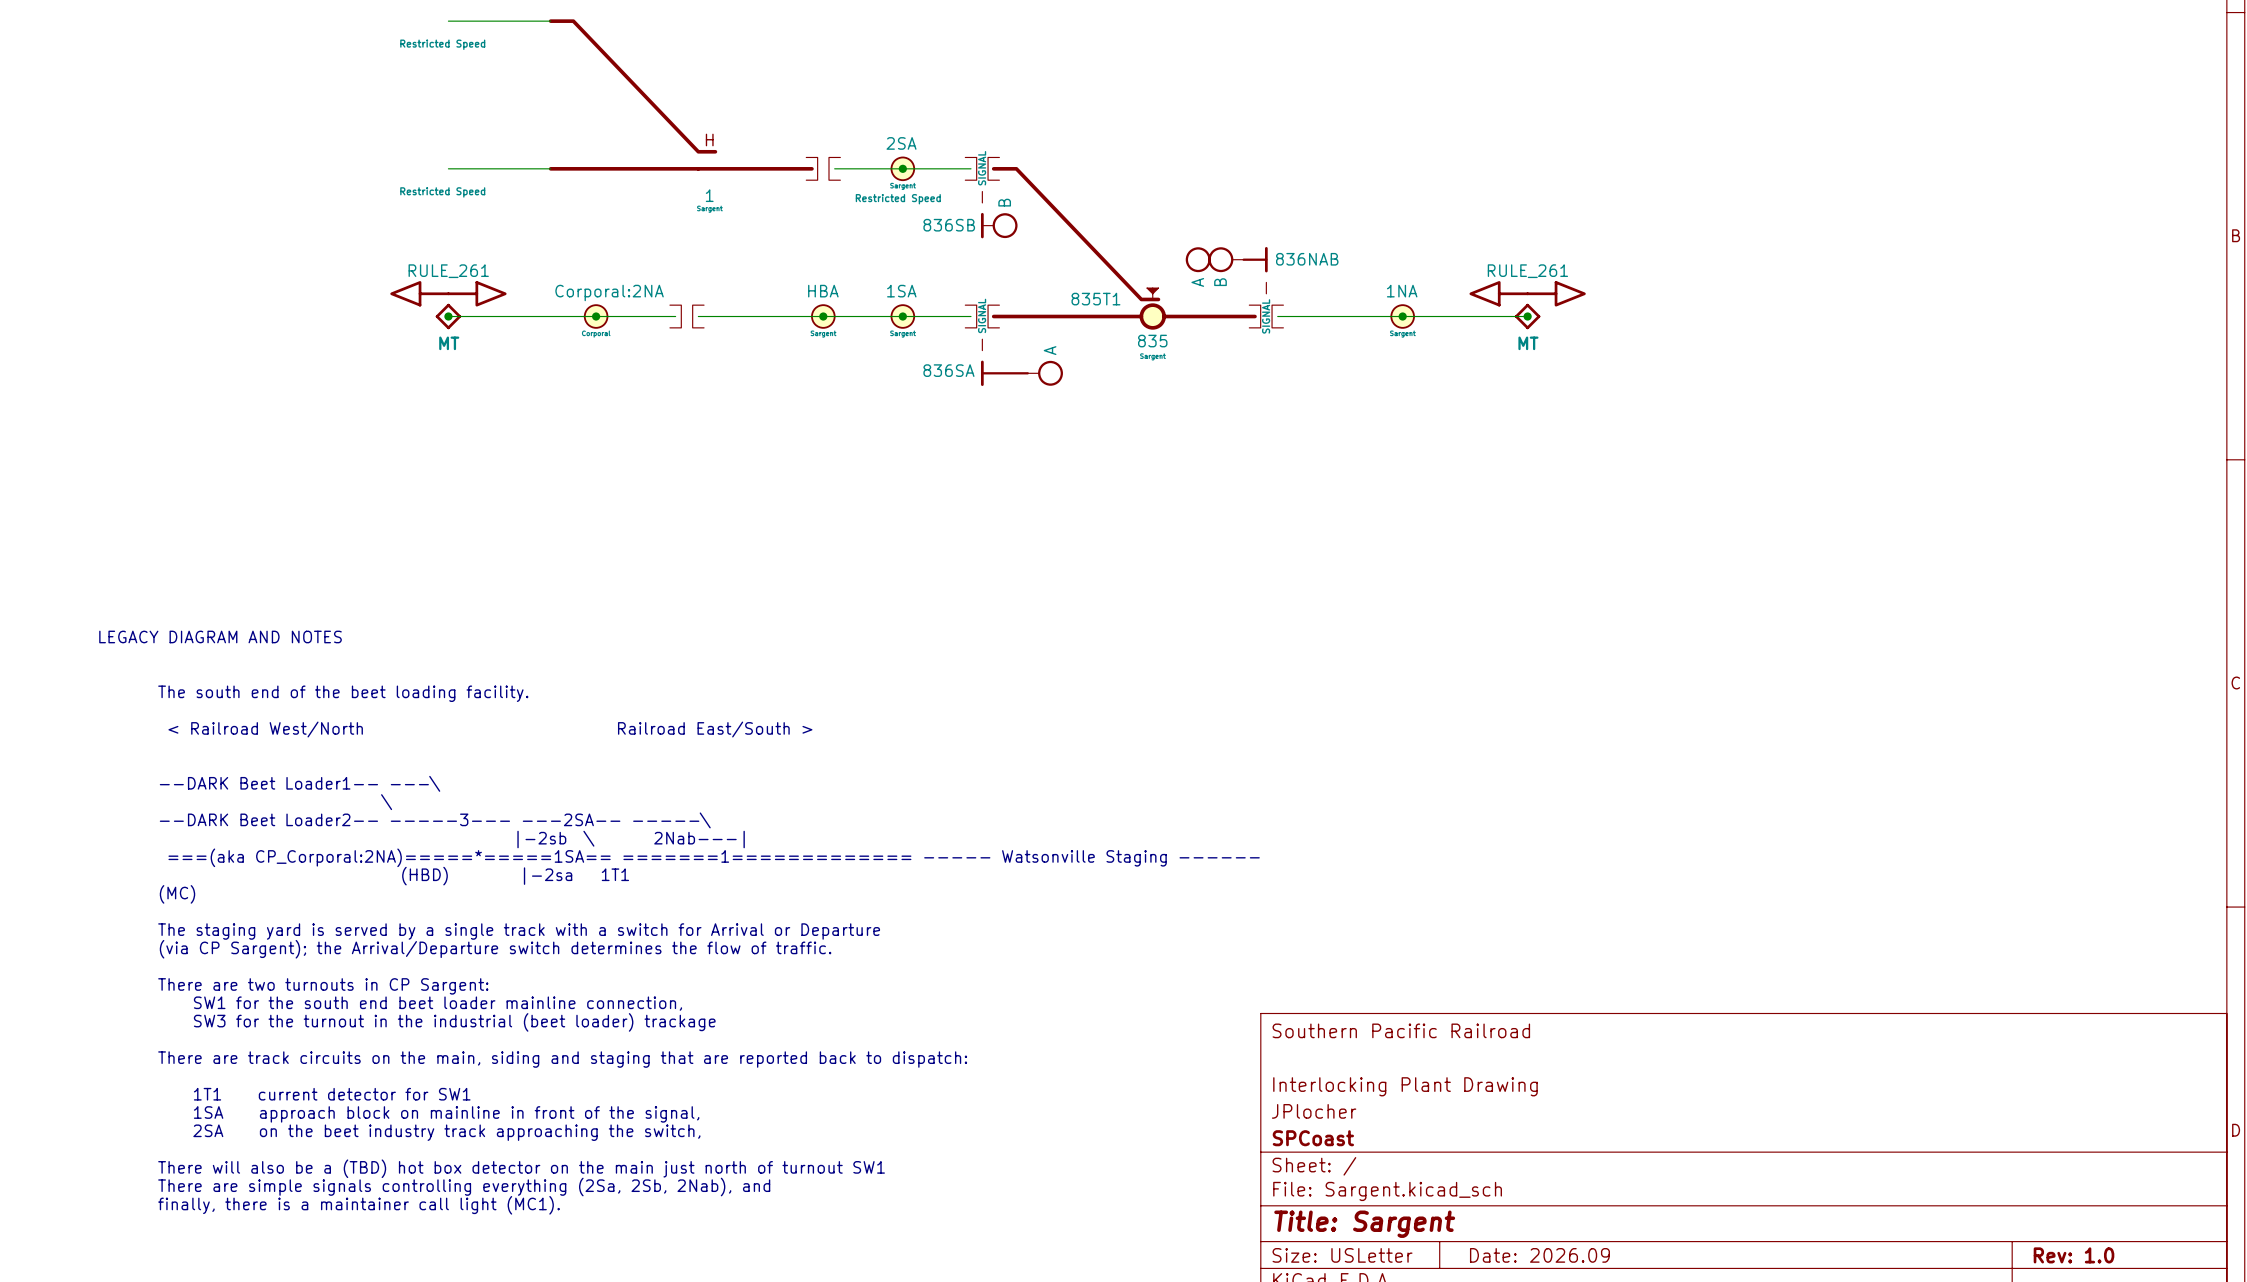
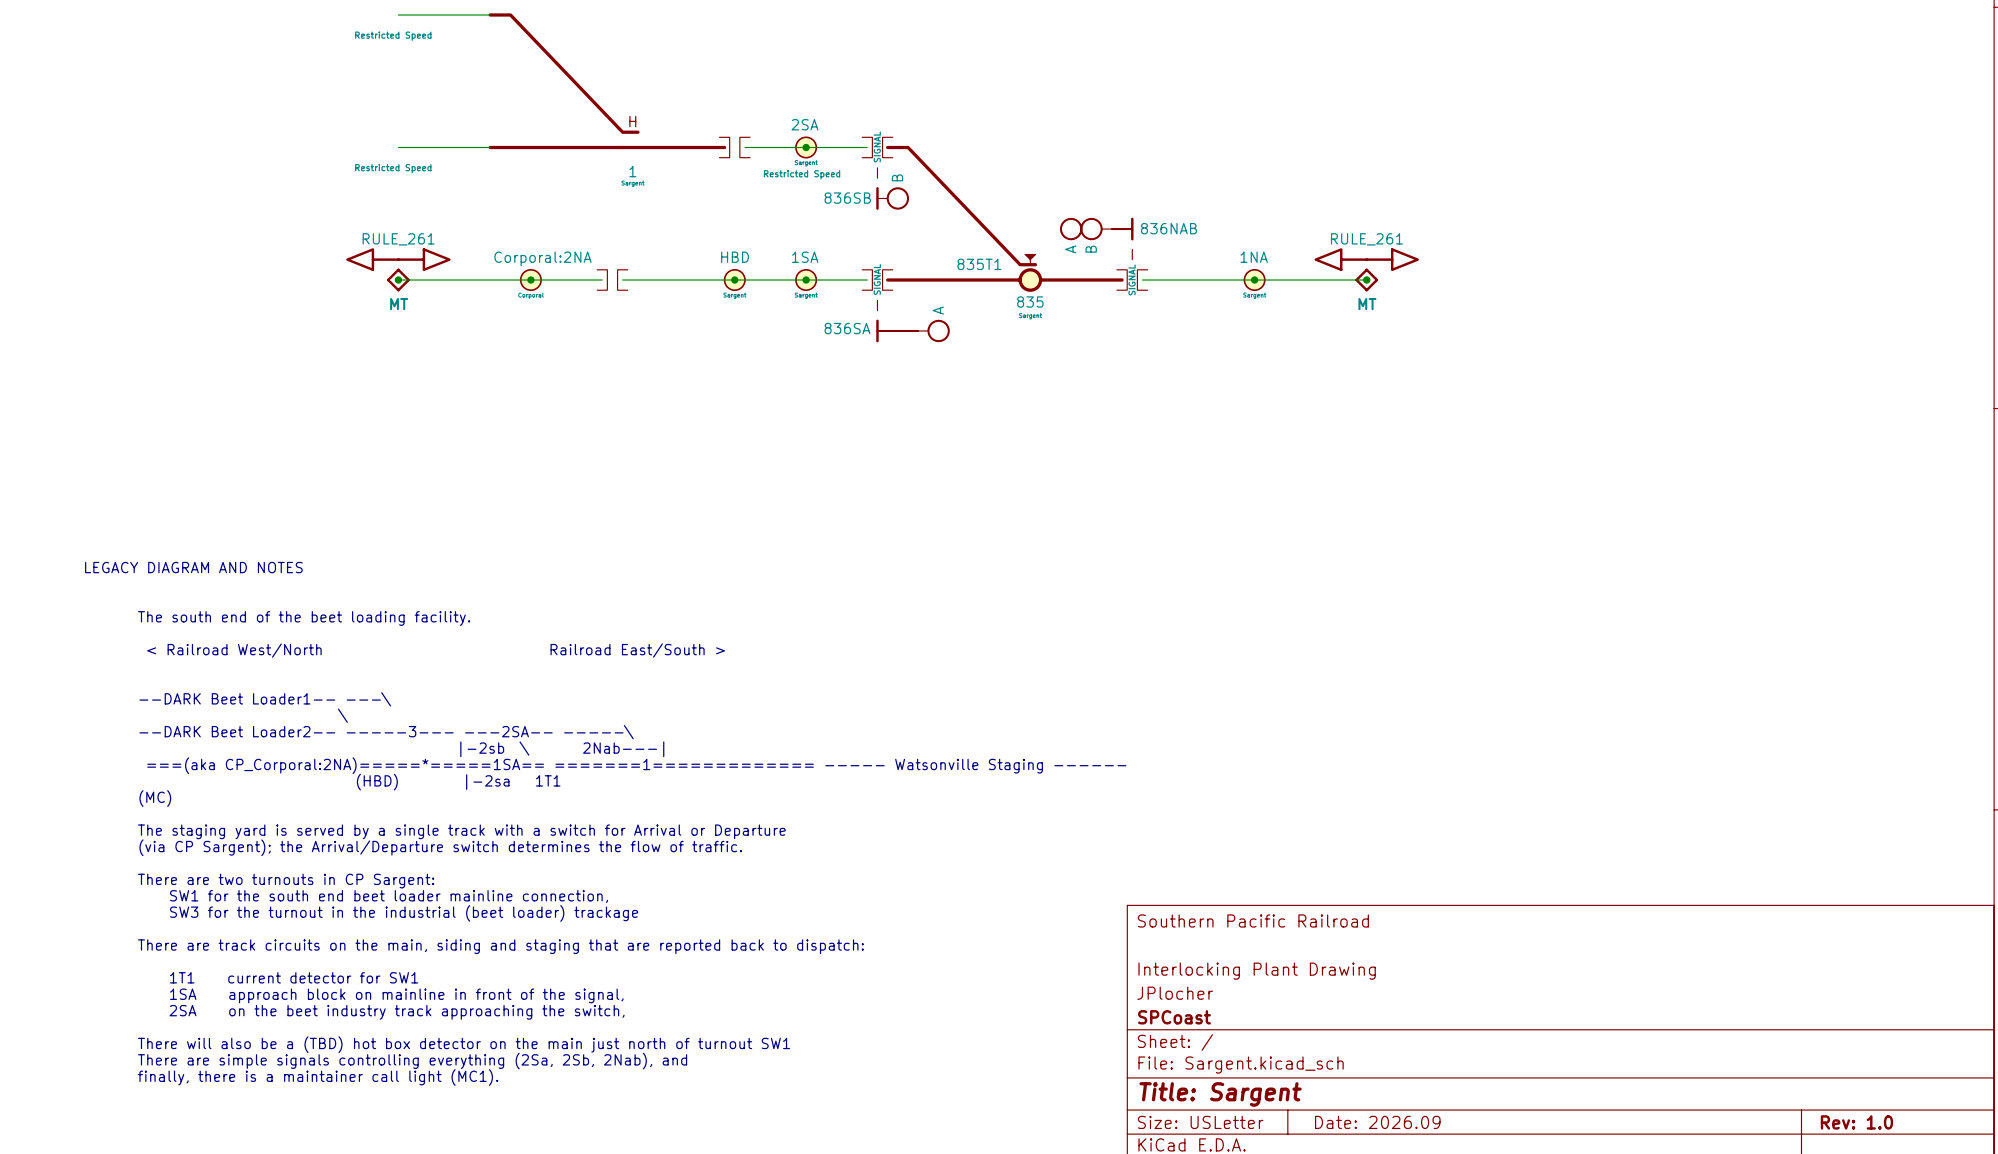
part value: HBA (823, 291) -> HBD (735, 257)

